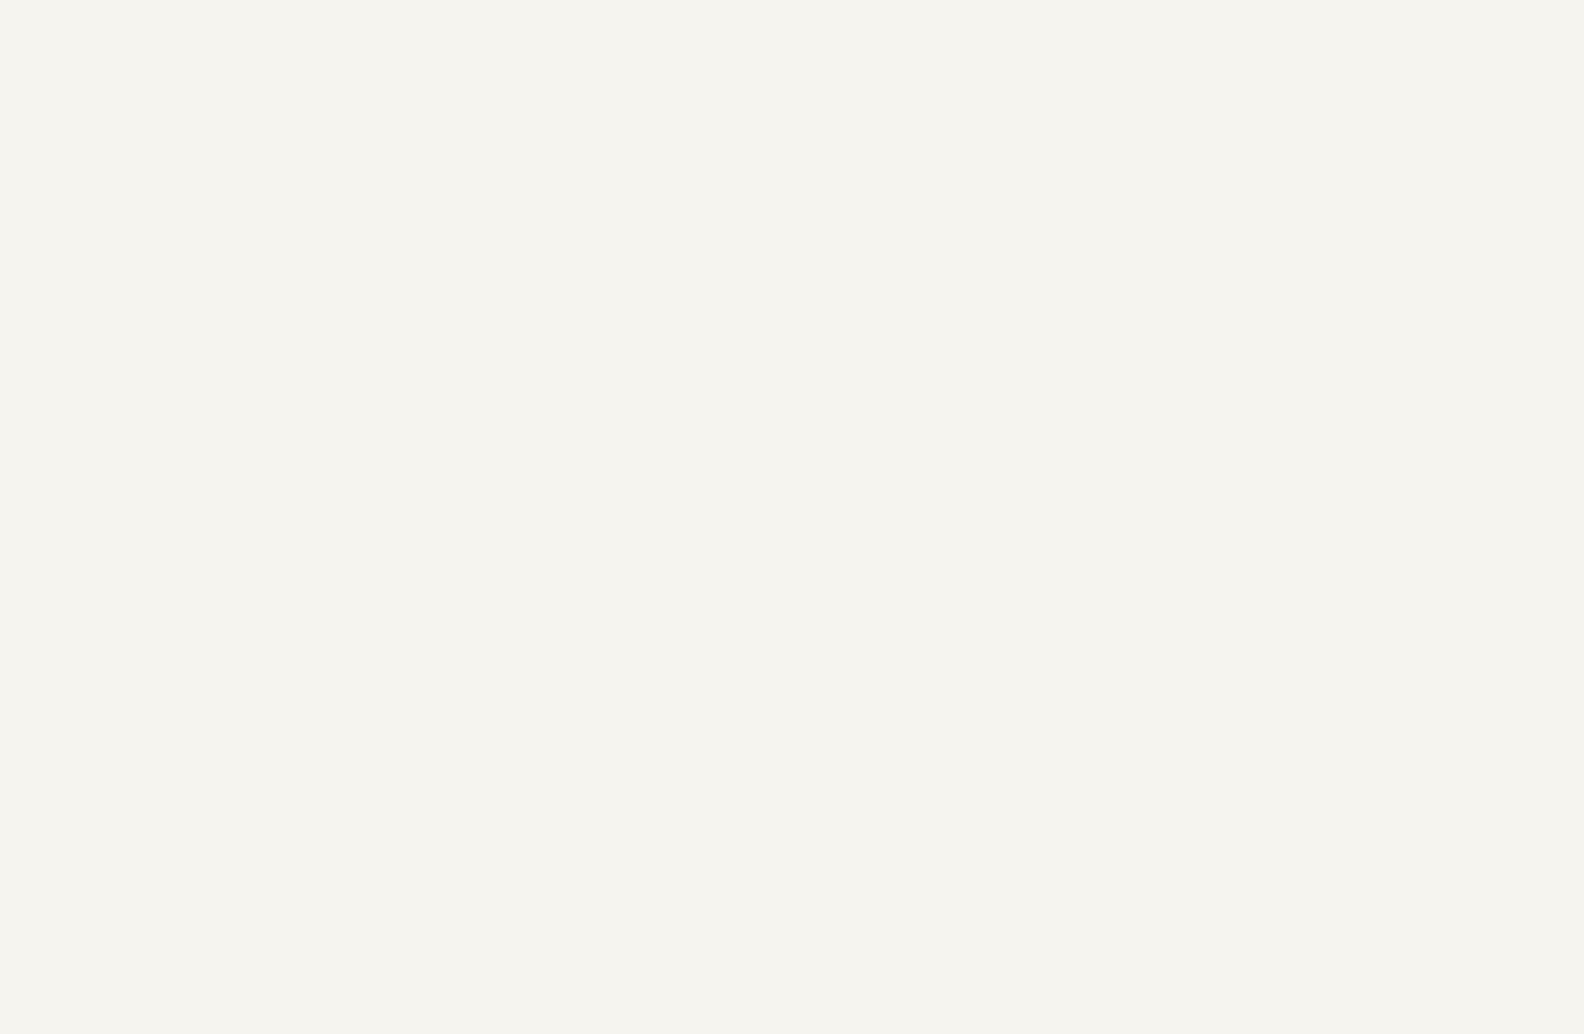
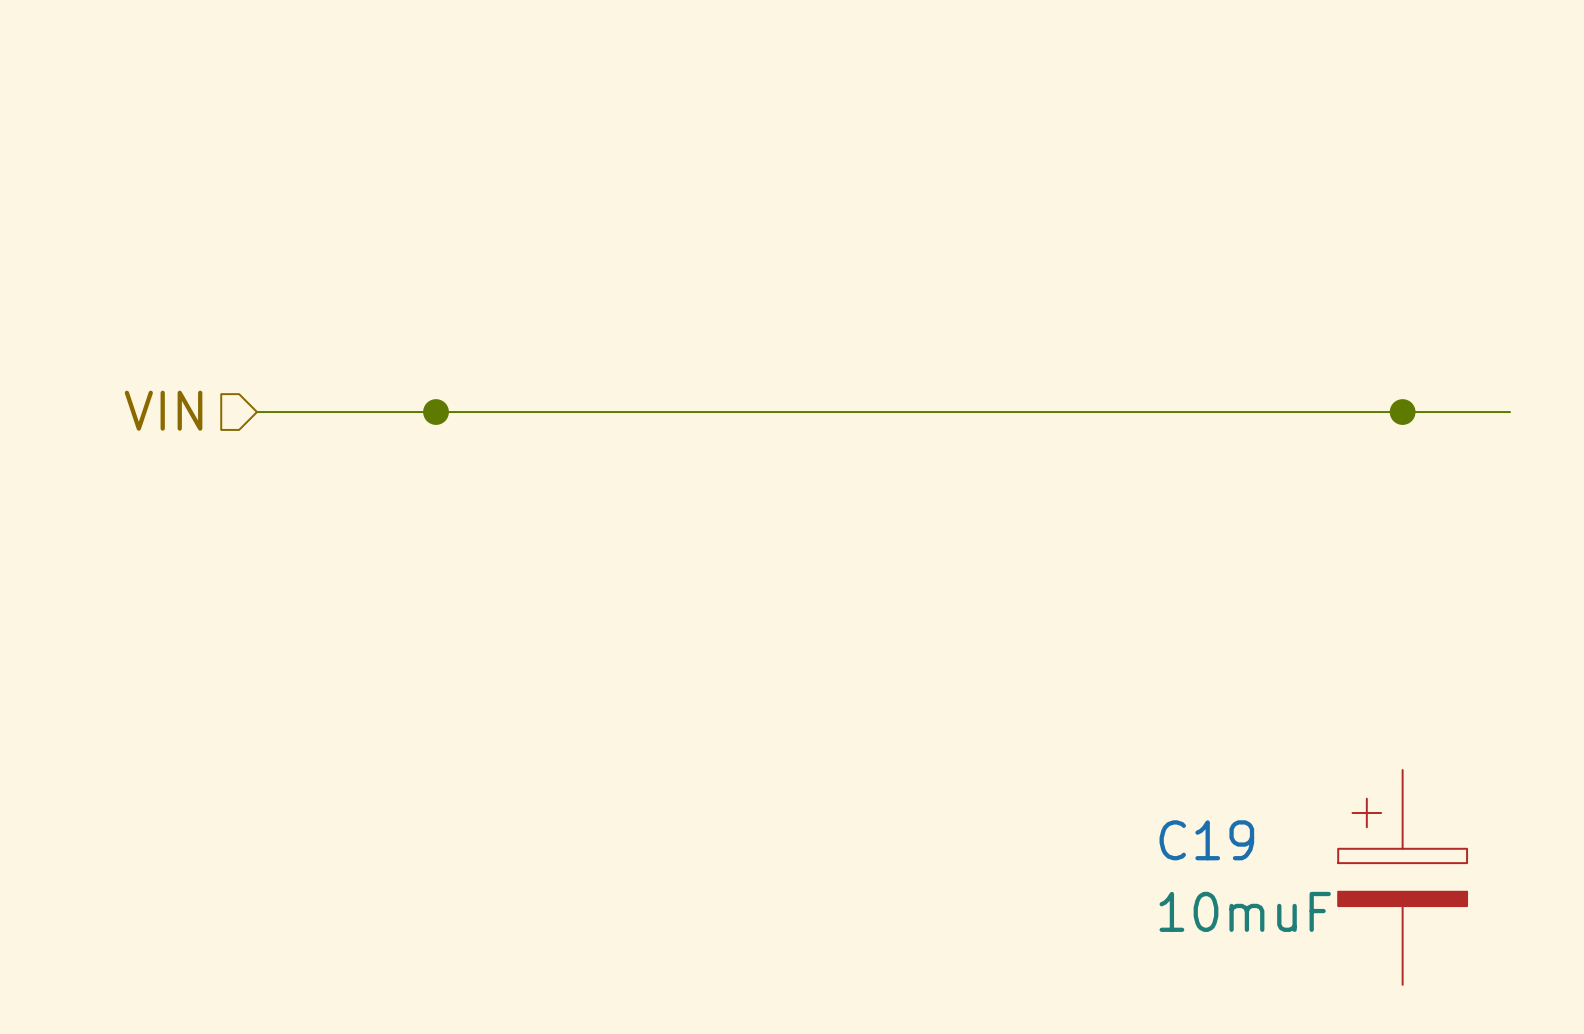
hierarchical label: none -> VIN (163, 410)
wire: none -> (257, 412) (1510, 412)
junction: none -> (436, 412)
junction: none -> (1402, 412)
C19: none -> 10muF (1402, 877)

